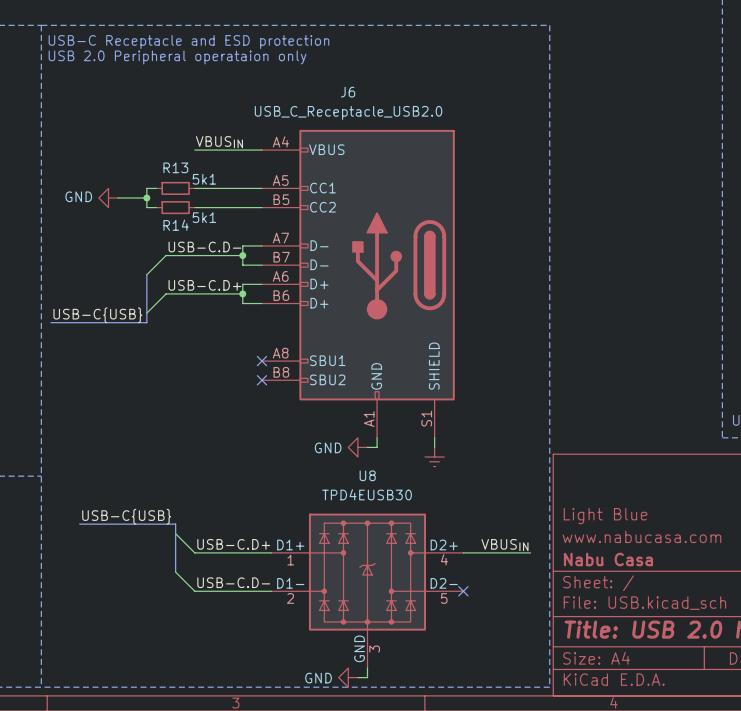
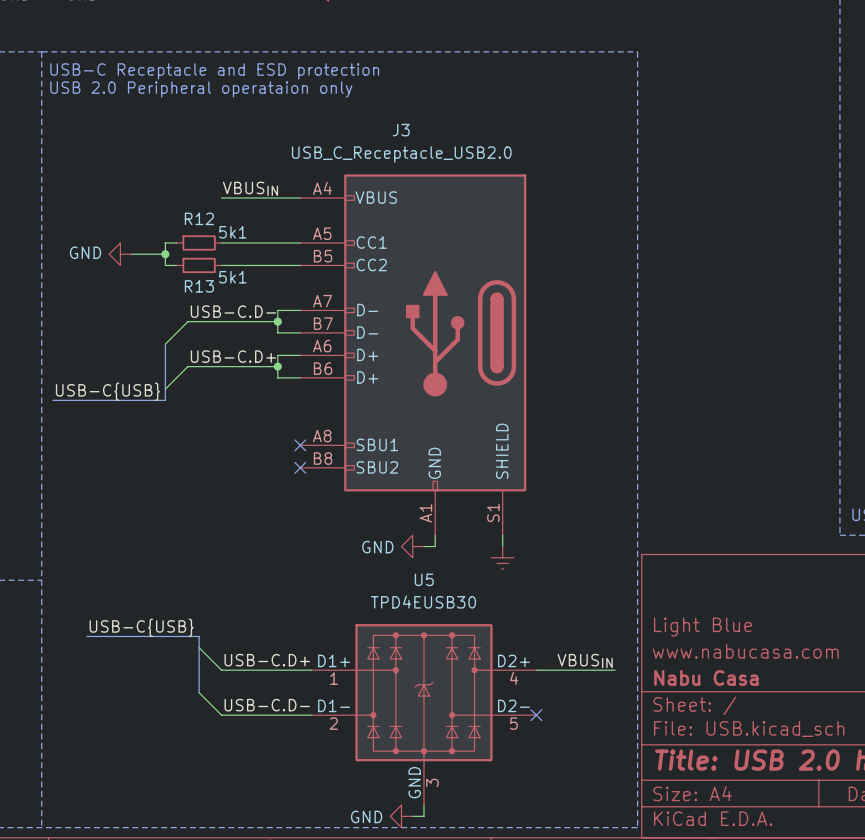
J6 name: J6 (348, 92) -> J3 (401, 130)
R13 name: R13 (175, 167) -> R12 (199, 218)
R14 name: R14 (176, 225) -> R13 (199, 286)
U8 name: U8 (367, 475) -> U5 (424, 579)

